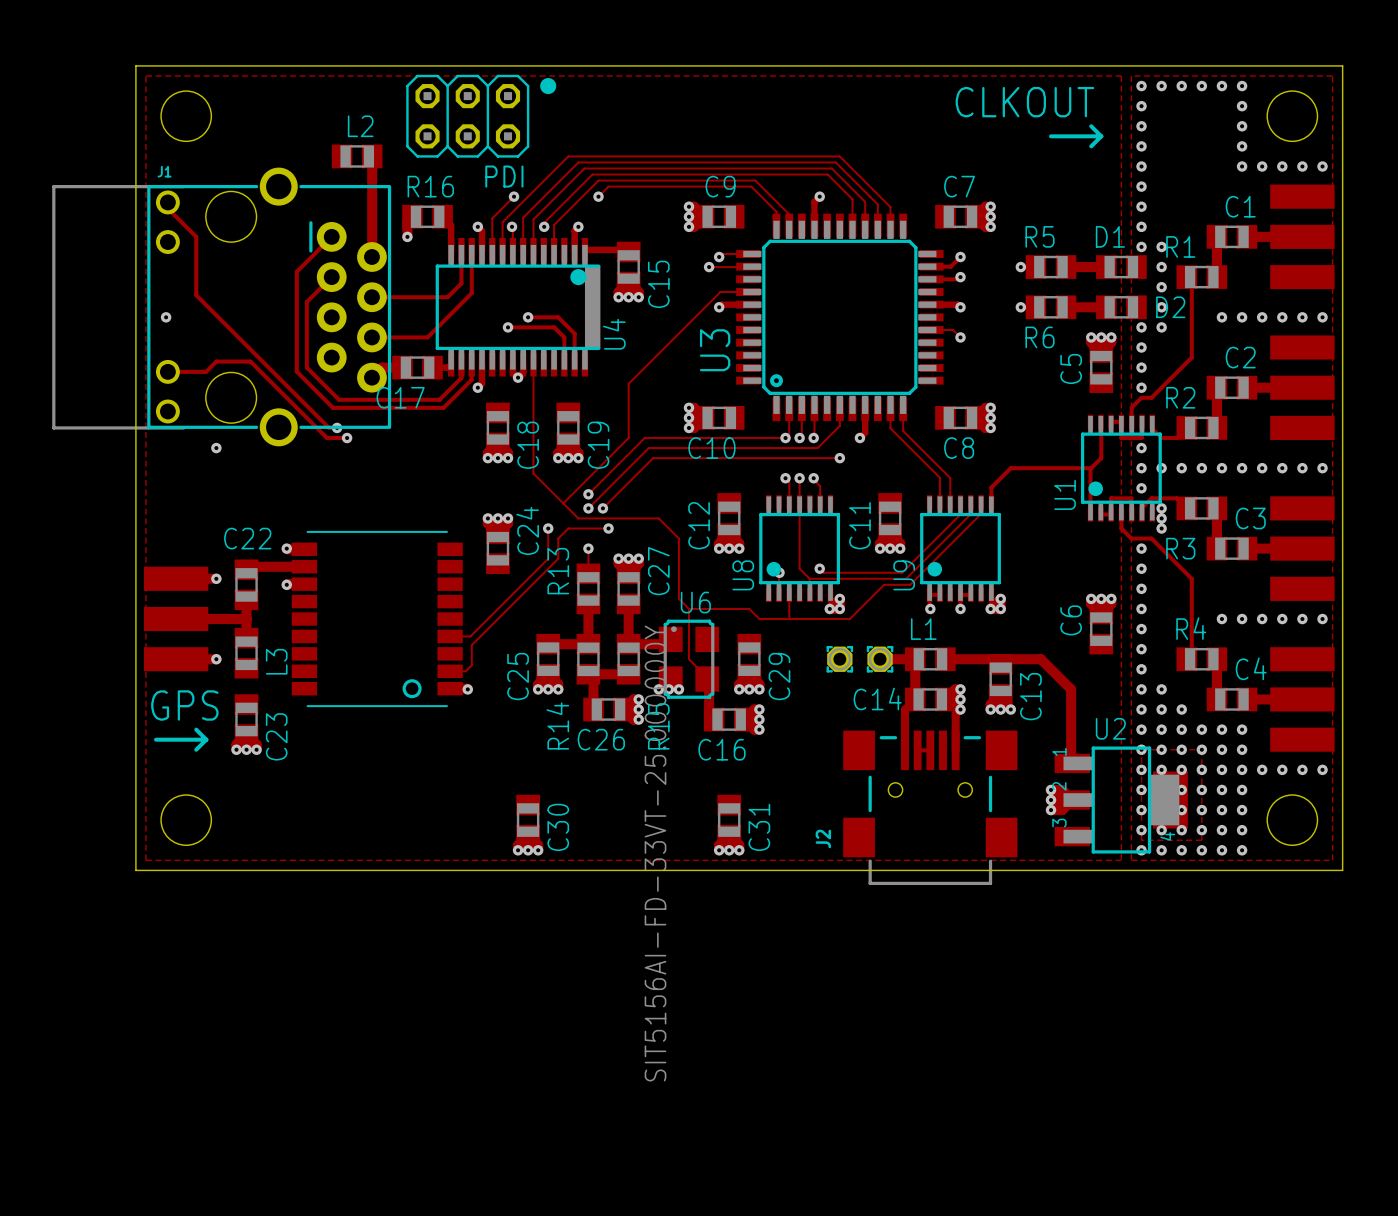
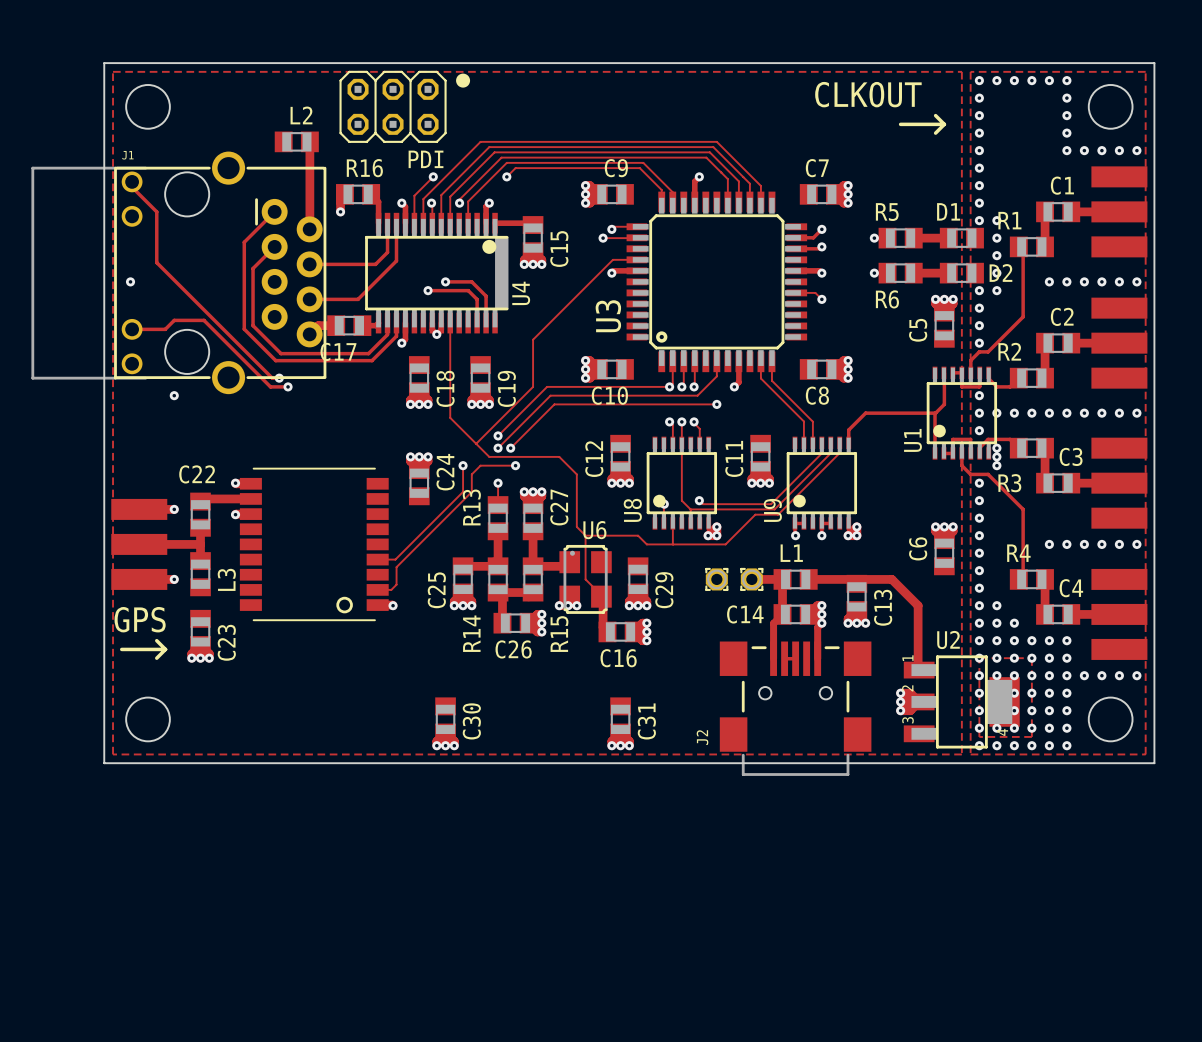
U6 value: SIT5156AI-FD-33VT-25.000000Y (655, 853) -> none

